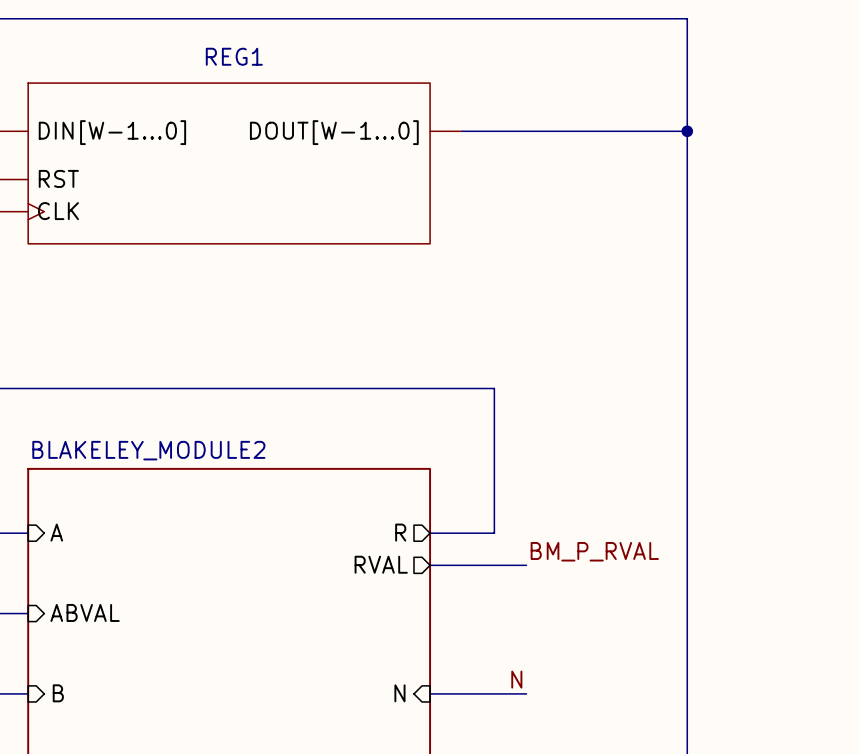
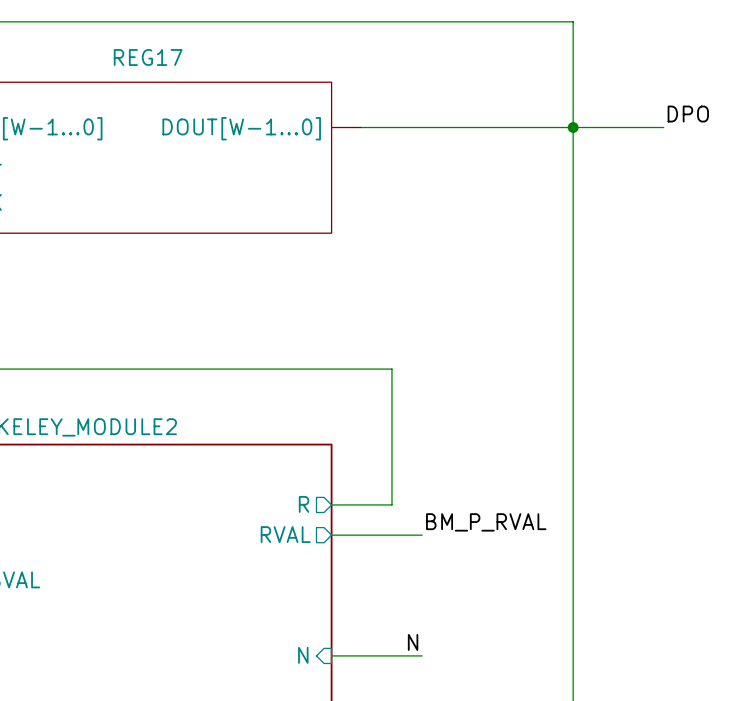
REG1 name: REG1 (234, 56) -> REG17 (148, 57)
label: none -> DPO (688, 114)
wire: none -> (573, 127) (663, 127)

